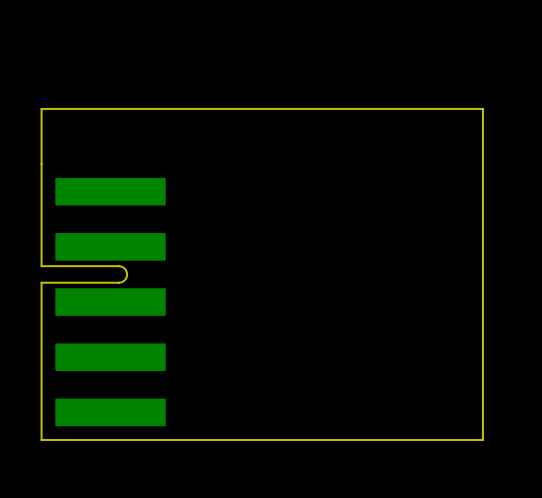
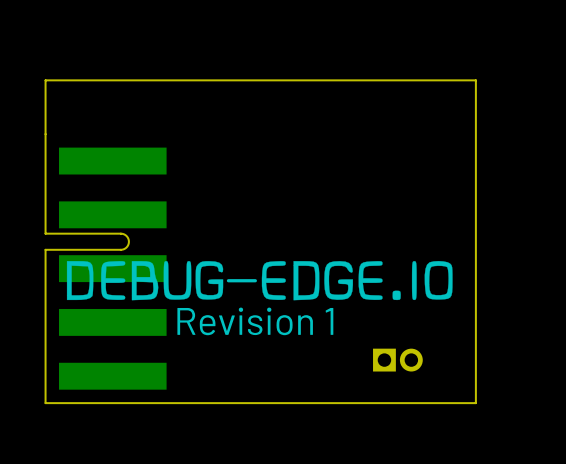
drawing: none -> [66, 260, 453, 301]
text: none -> Revision 1 (255, 321)
part: none -> (397, 360)

